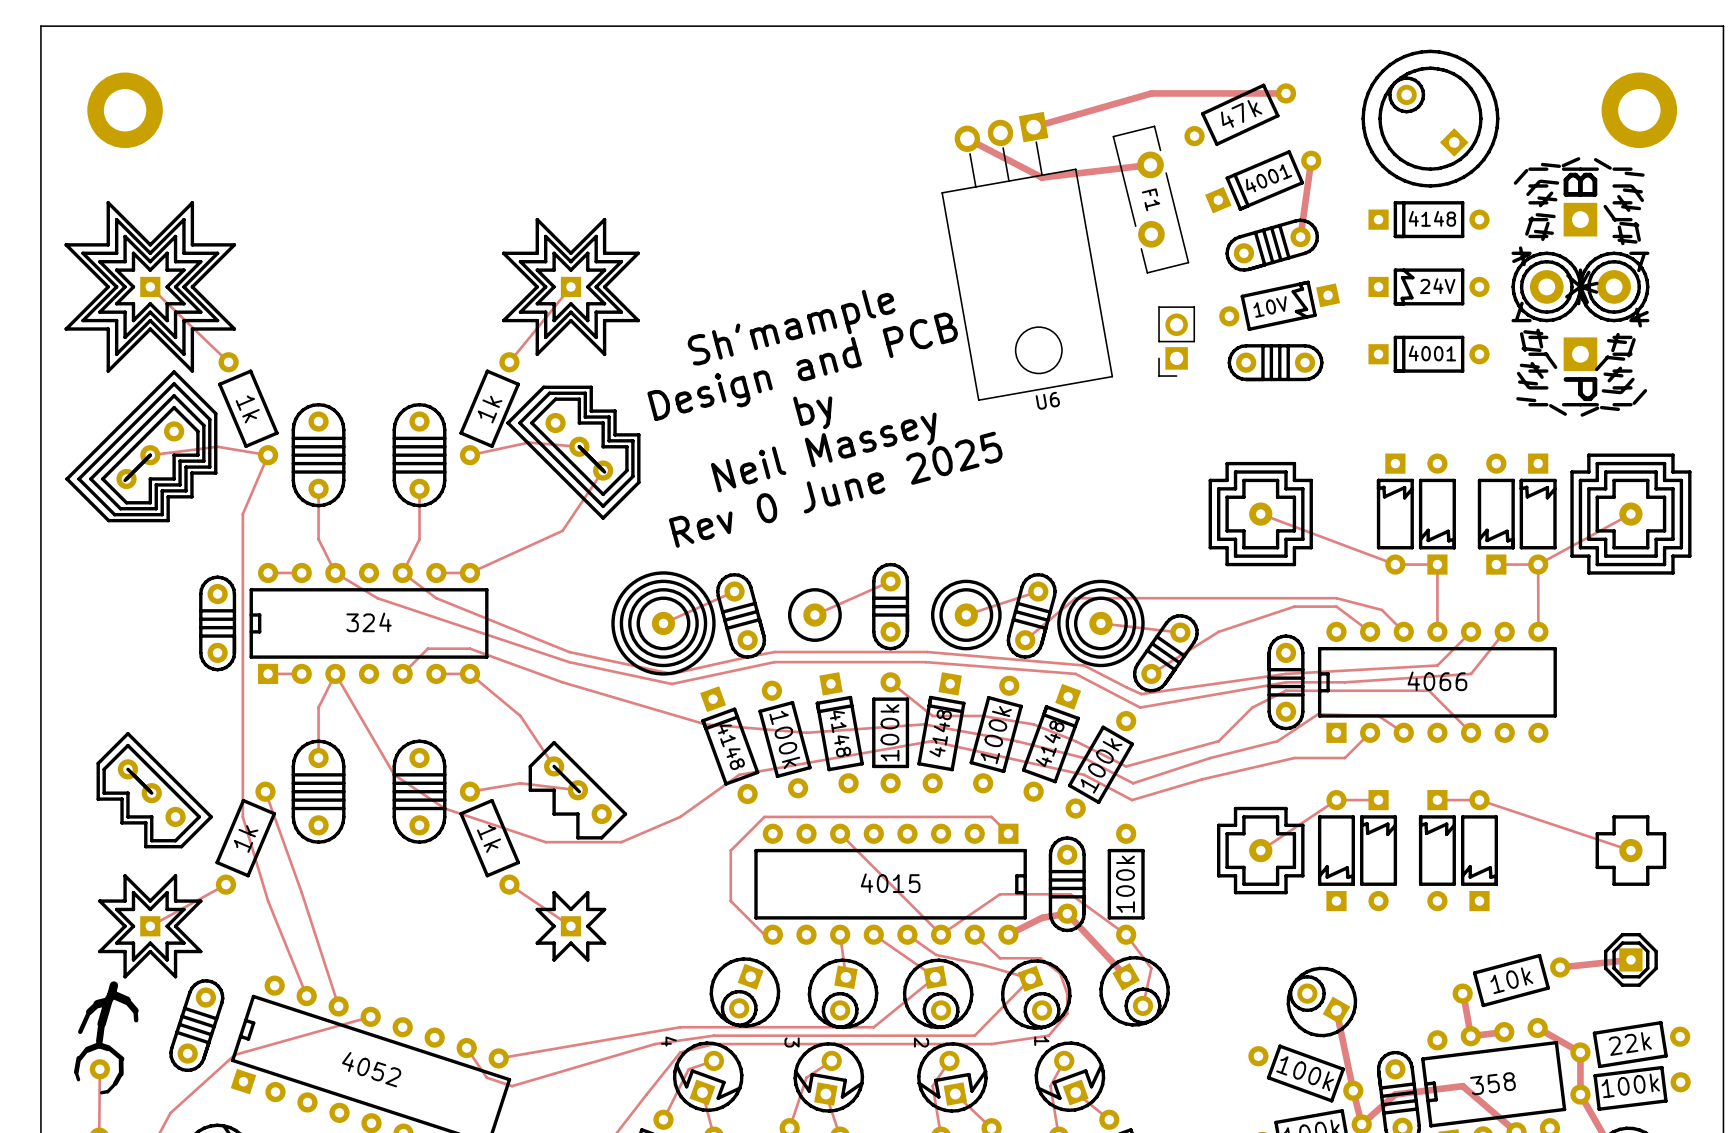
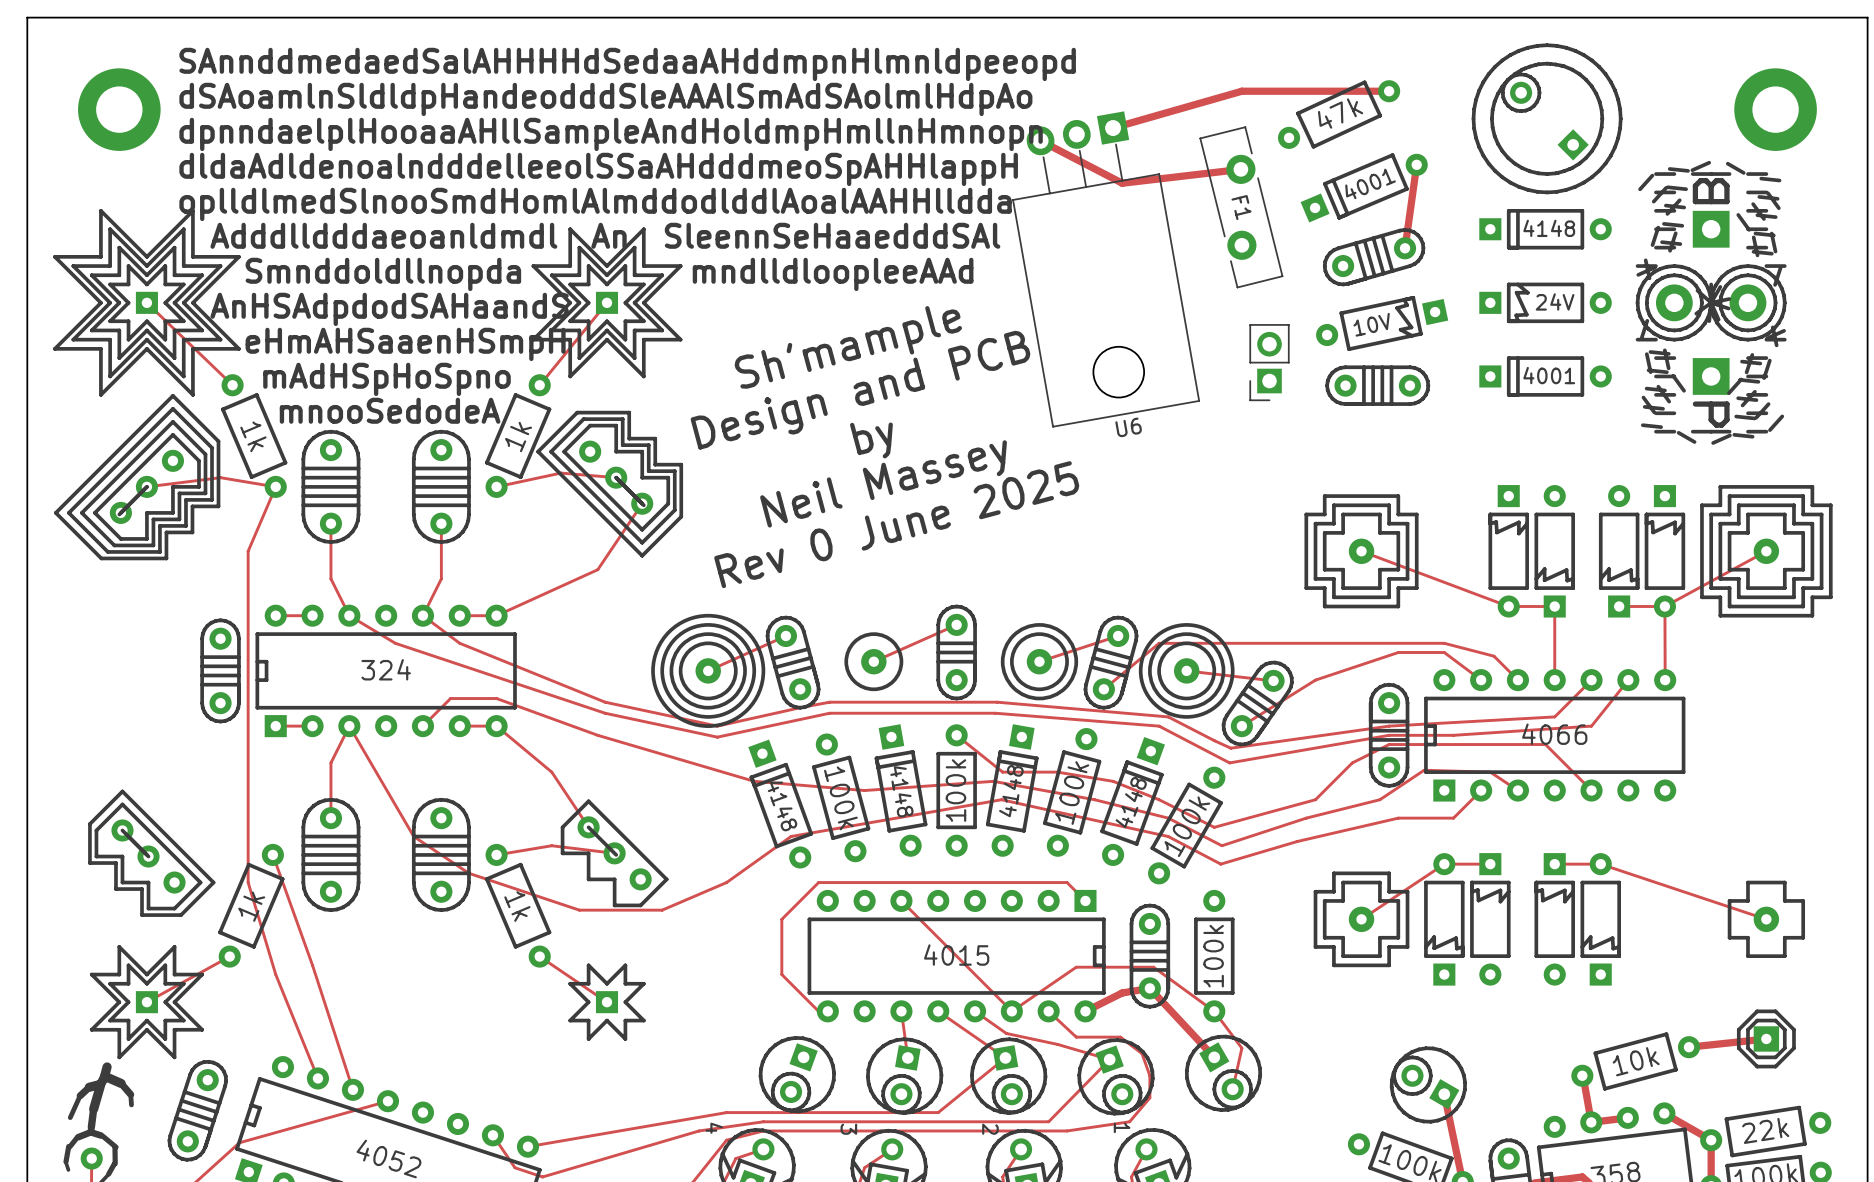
text: none -> SAnnddmedaedSalAHHHHdSedaaAHddmpnHlmnldpeeopd (627, 64)
text: none -> dSAoamlnSldldpHandeodddSleAAAlSmAdSAolmlHdpAo (605, 99)
text: none -> dpnndaelplHooaaAHllSampleAndHoldmpHmllnHmnopn (611, 134)
text: none -> dldaAdldenoalndddelleeolSSaAHdddmeoSpAHHlappH (598, 169)
text: none -> oplldlmedSlnooSmdHomlAlmddodlddlAoalAAHHlldda (595, 204)
text: none -> Adddlldddaeoanldmdl An SleennSeHaaedddSAl (605, 235)
text: none -> Smnddoldllnopda mndlldloopleeAAd (609, 274)
text: none -> AnHSAdpdodSAHaandS (389, 309)
text: none -> eHmAHSaaenHSmpH (405, 344)
text: none -> mAdHSpHoSpno (386, 379)
text: none -> mnooSedodeA (390, 410)

